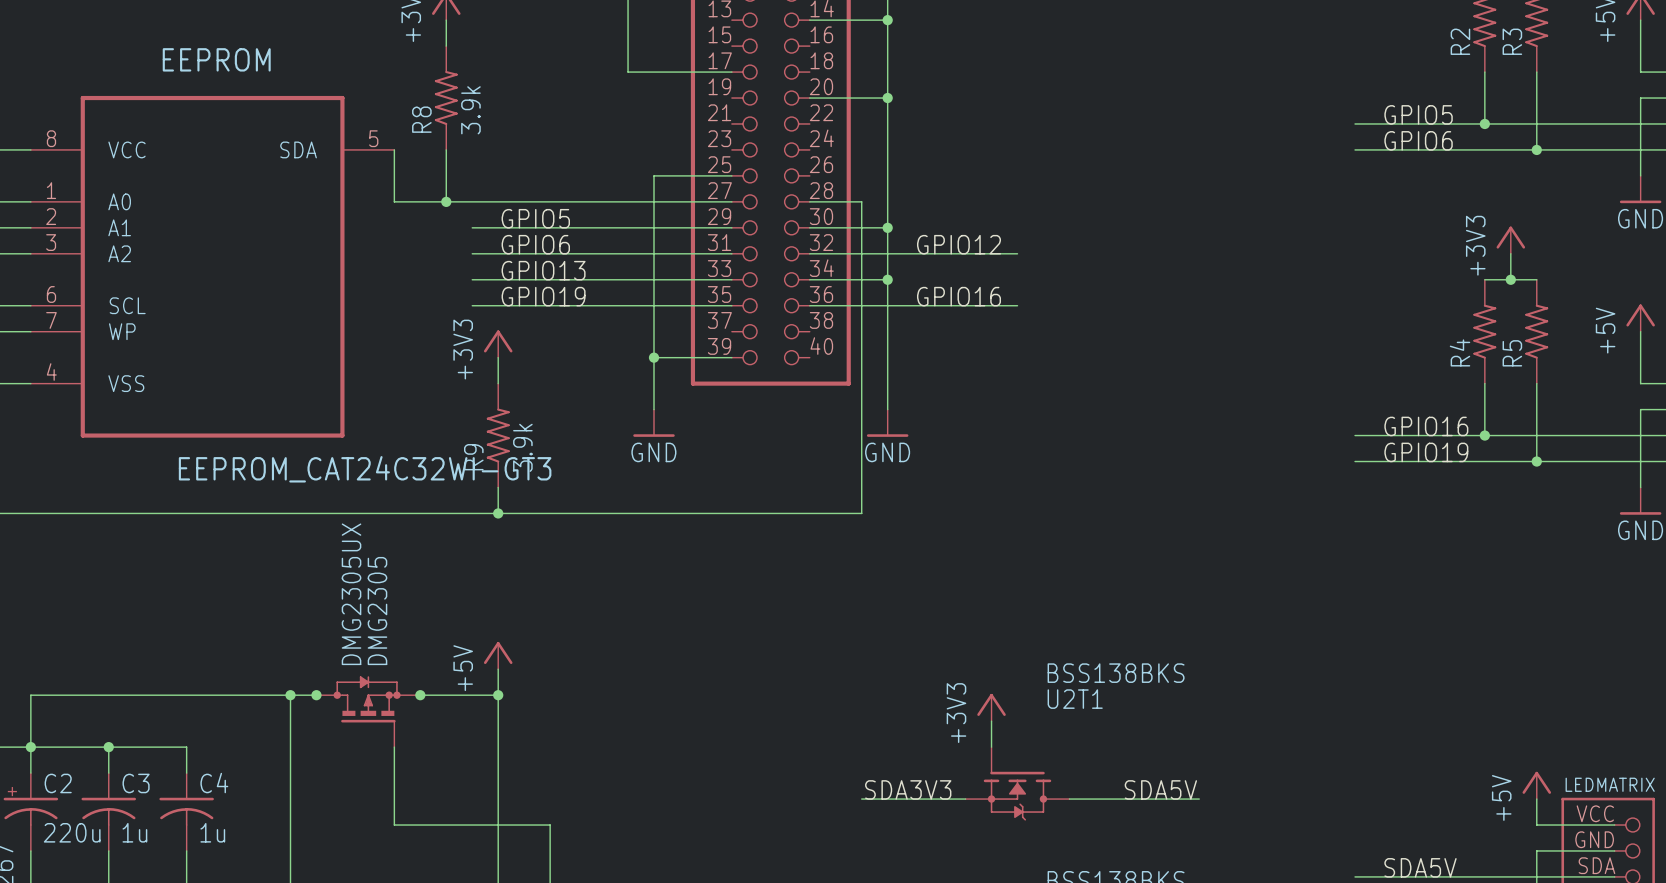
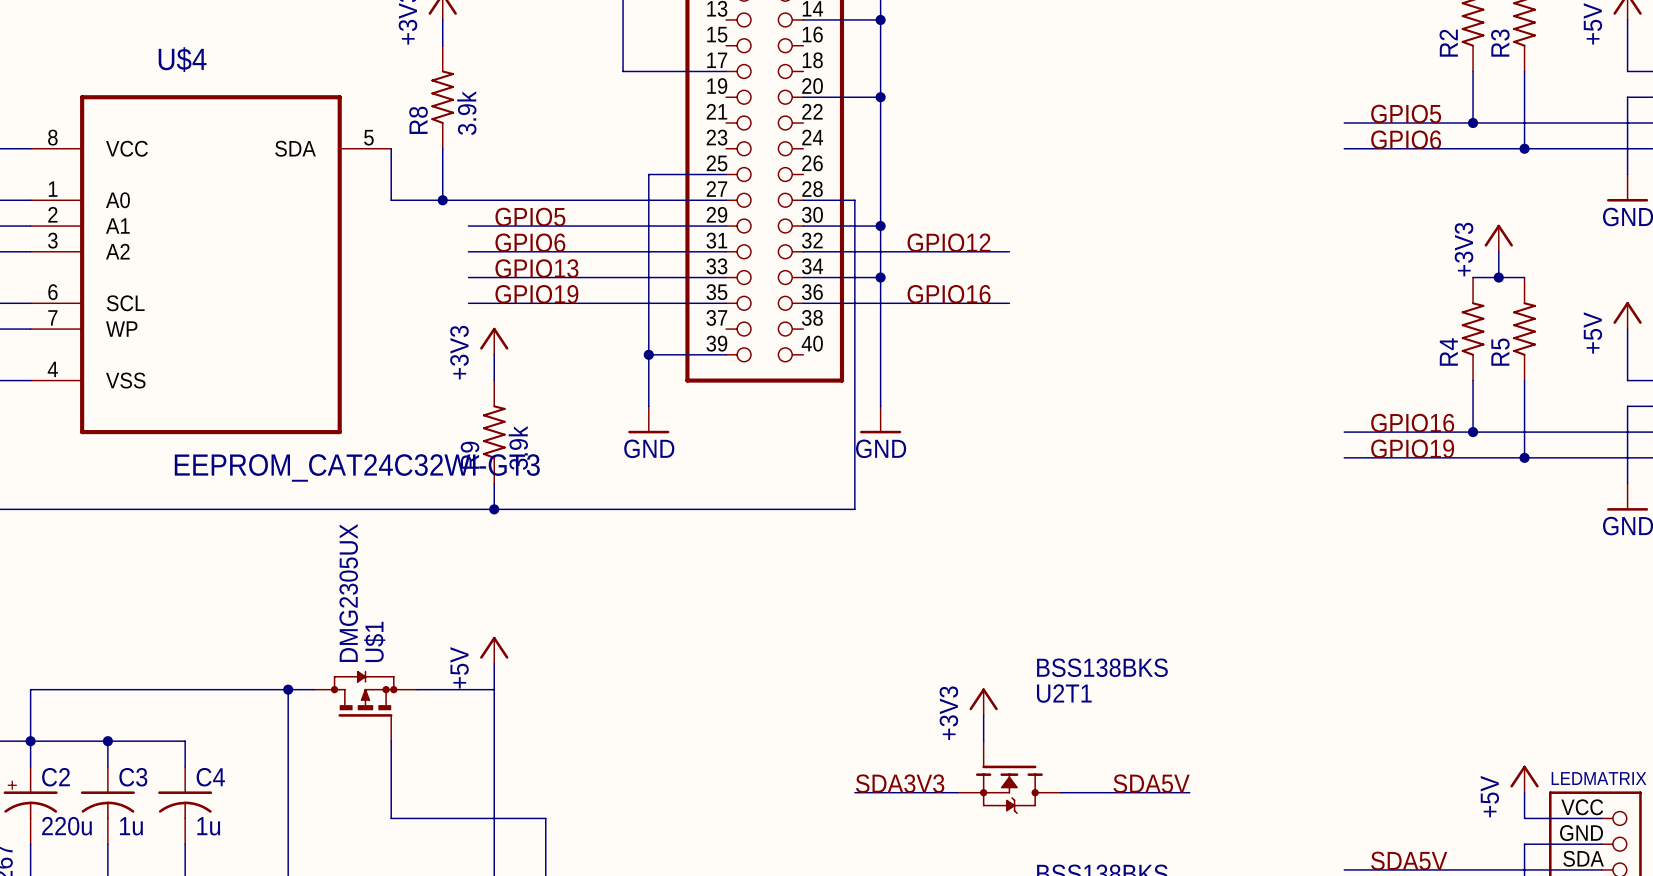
EEPROM name: EEPROM (216, 59) -> U$4 (182, 59)
DMG2305 name: DMG2305 (377, 611) -> U$1 (374, 641)
junction: (316, 695) -> none
junction: (420, 695) -> none
junction: (498, 695) -> none

